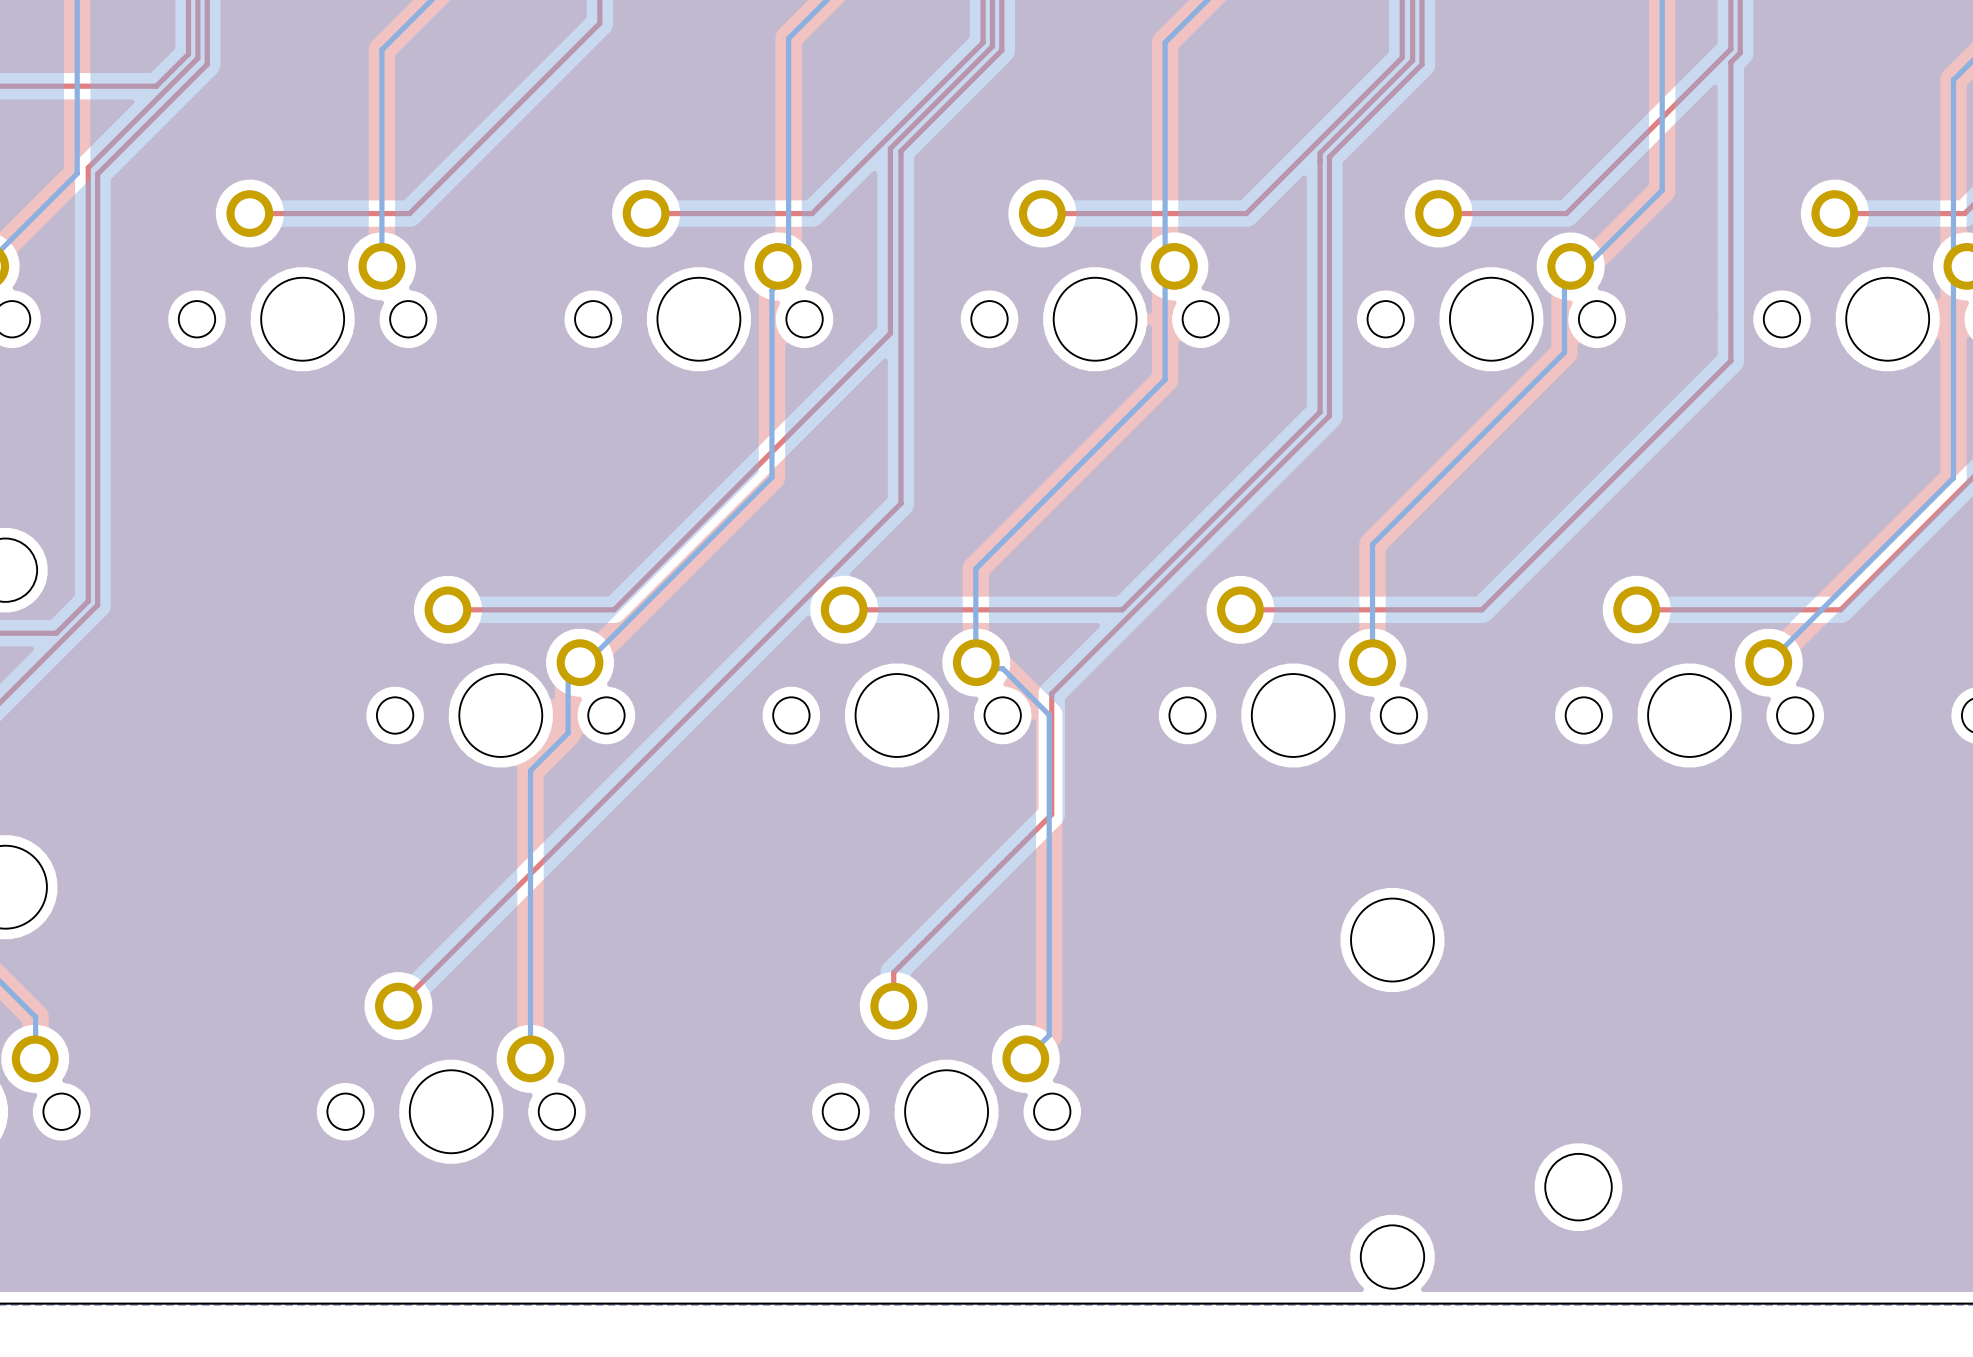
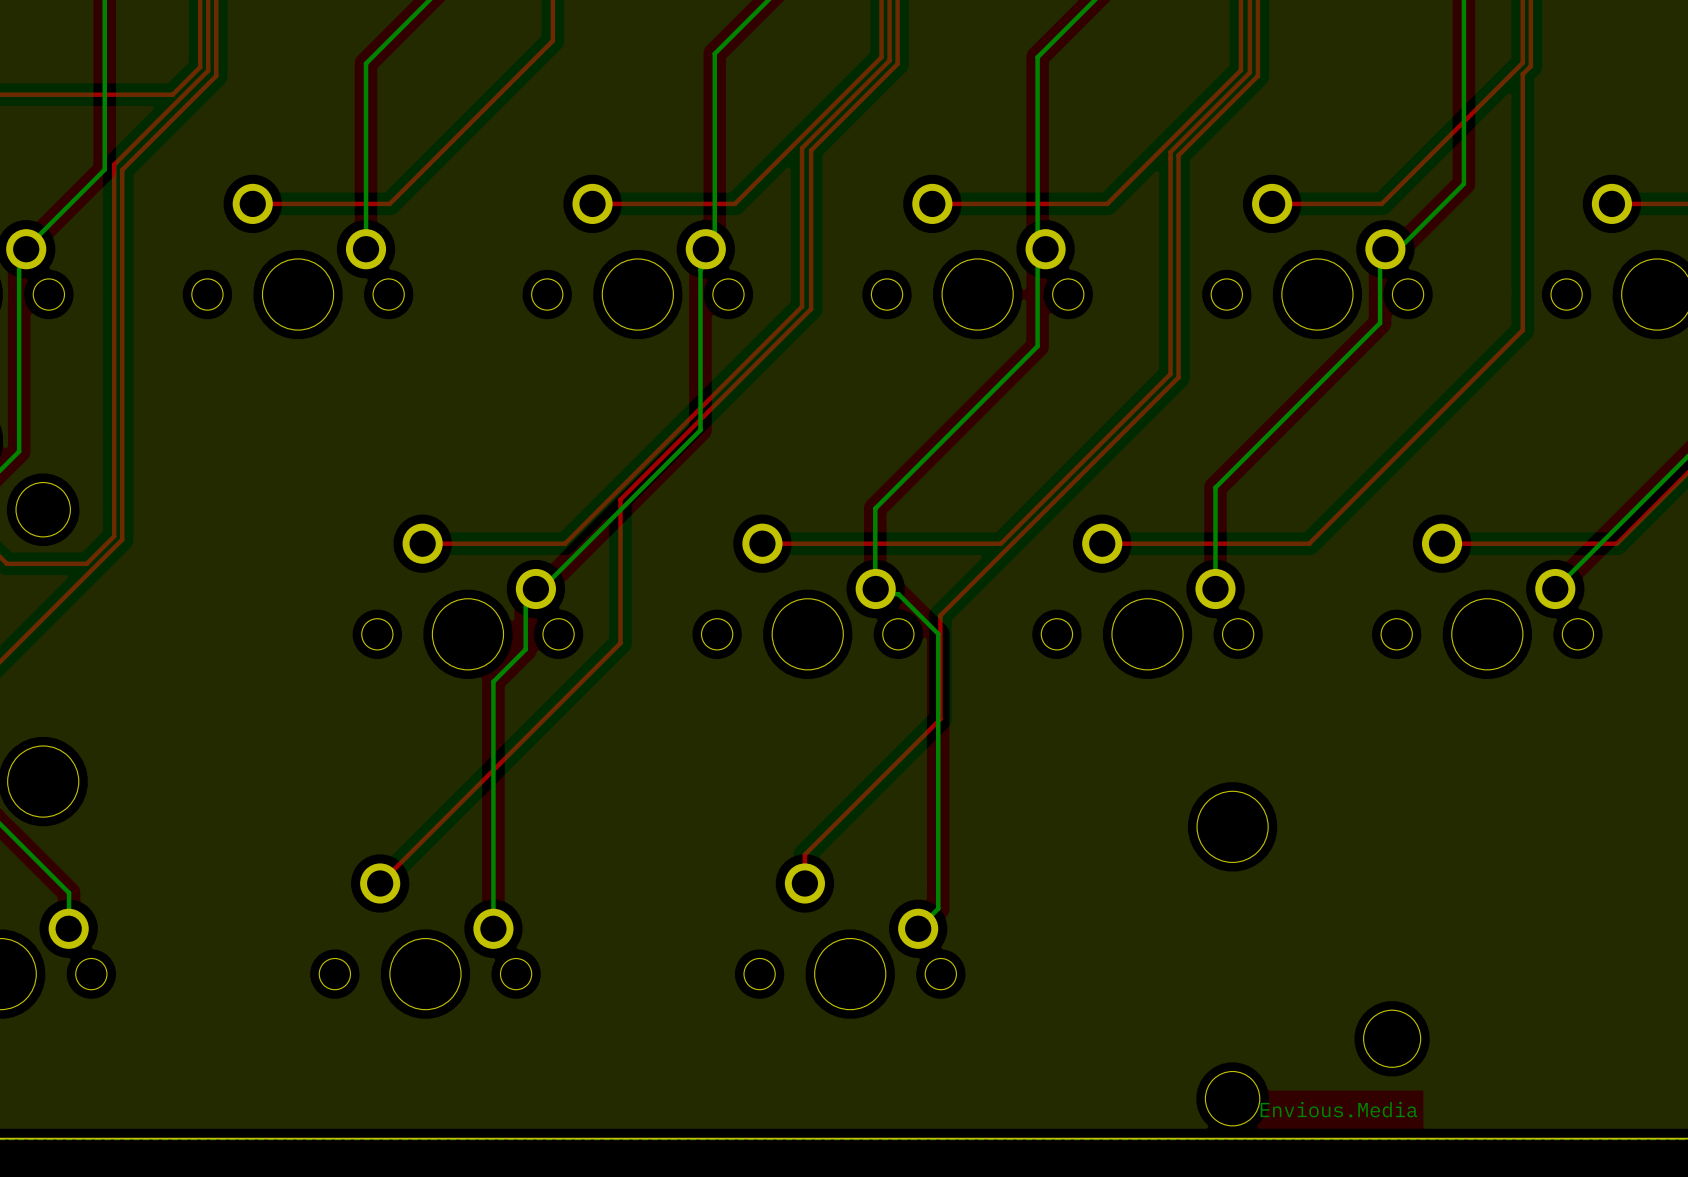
top track: (900, 336) (900, 503) (678, 725) -> (811, 309) (620, 499) (620, 643)
text: none -> Envious.Media (1338, 1109)

